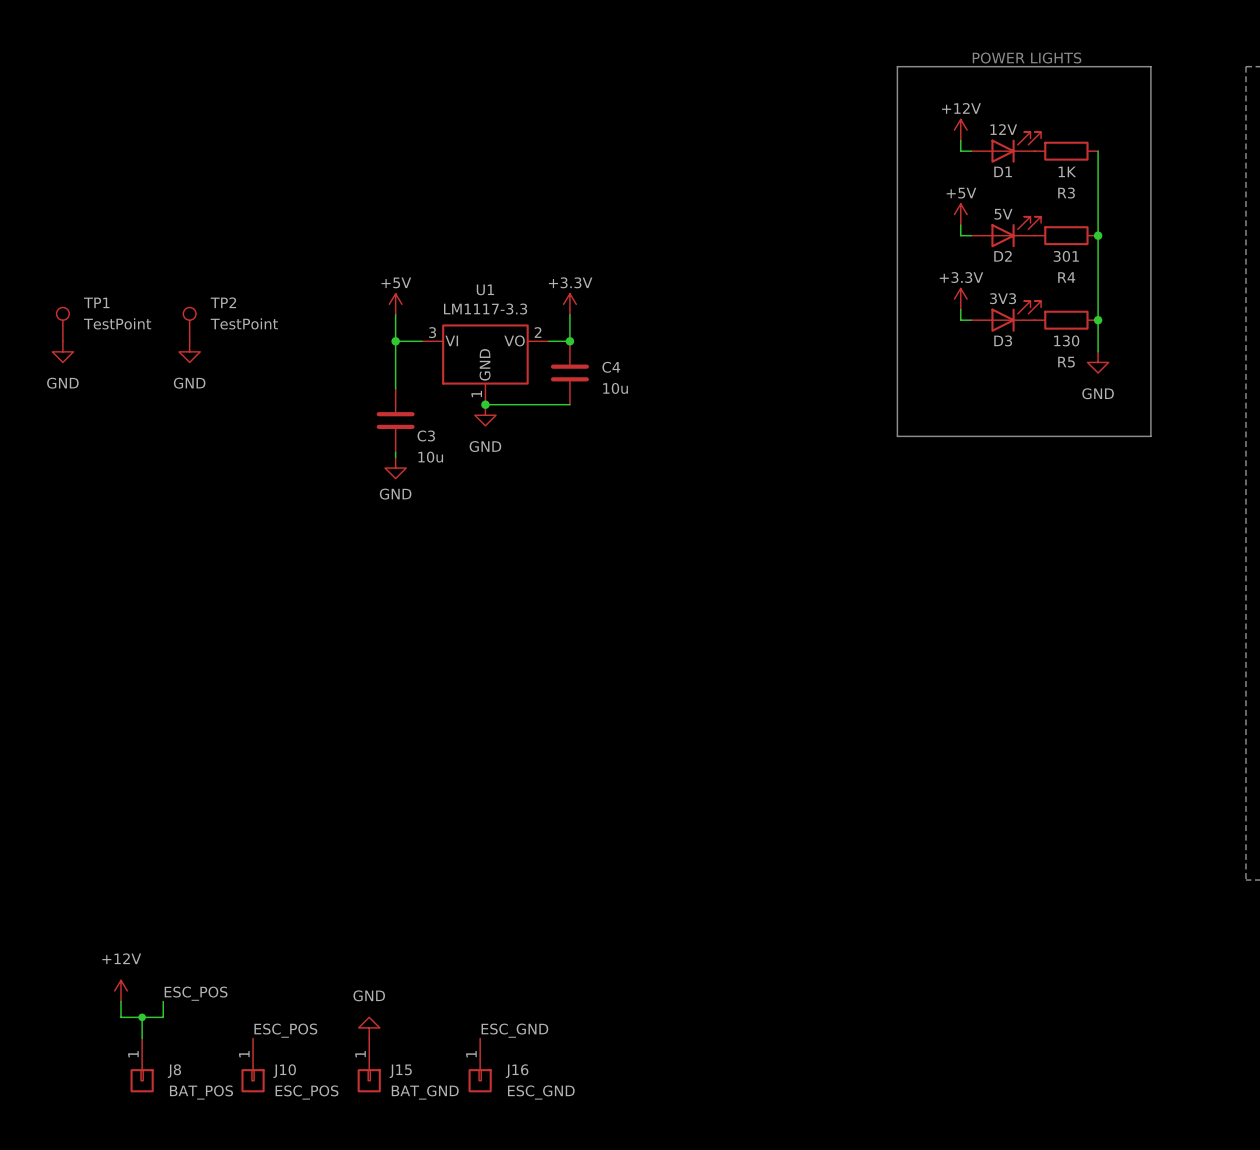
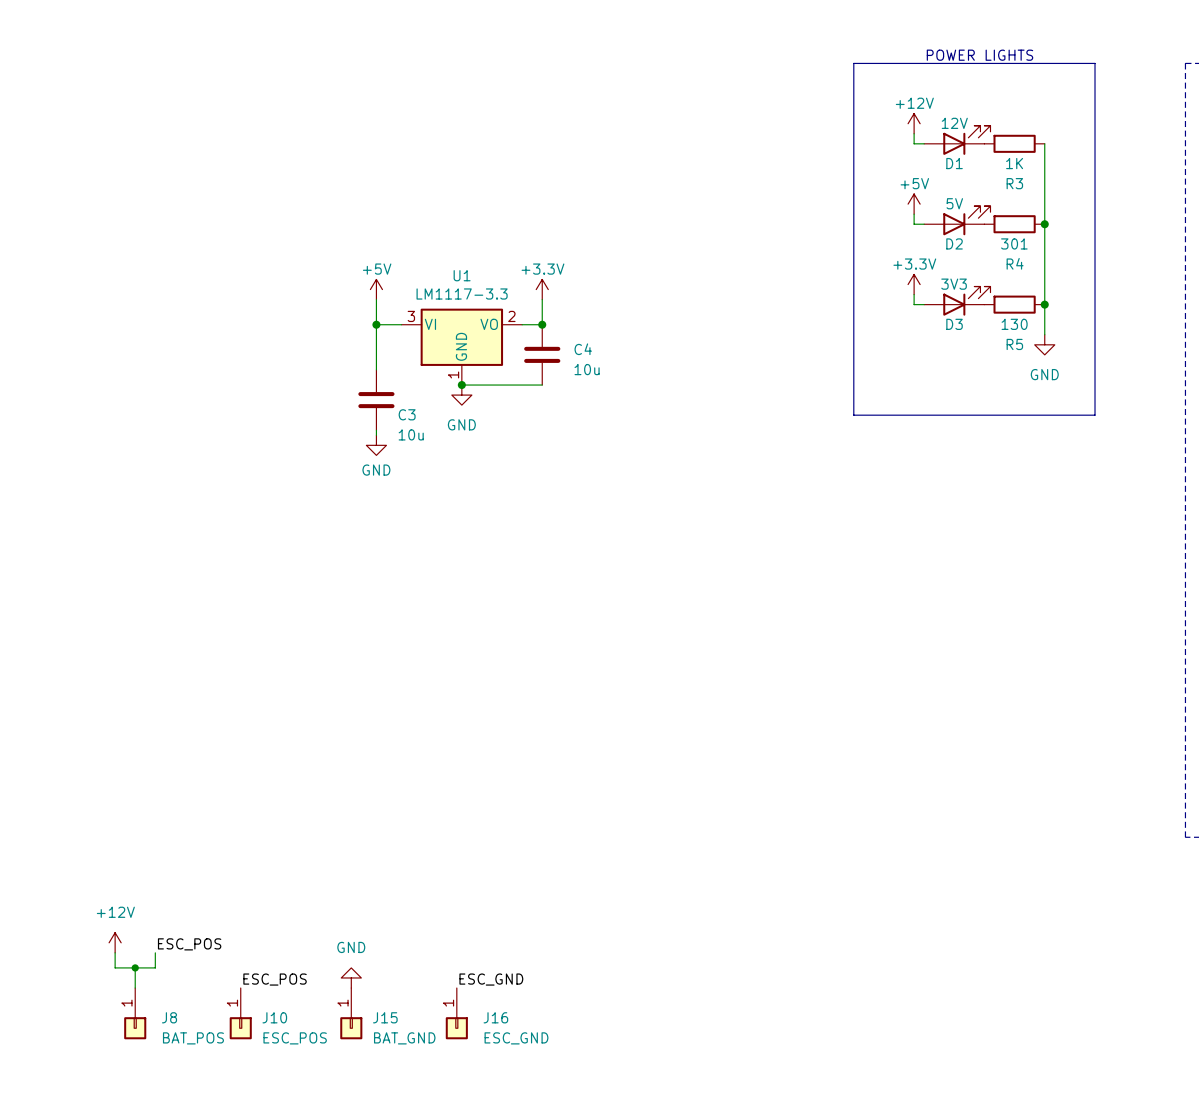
TP1: TestPoint (62, 324) -> none
TP2: TestPoint (189, 324) -> none
power symbol: GND (62, 351) -> none
power symbol: GND (189, 351) -> none

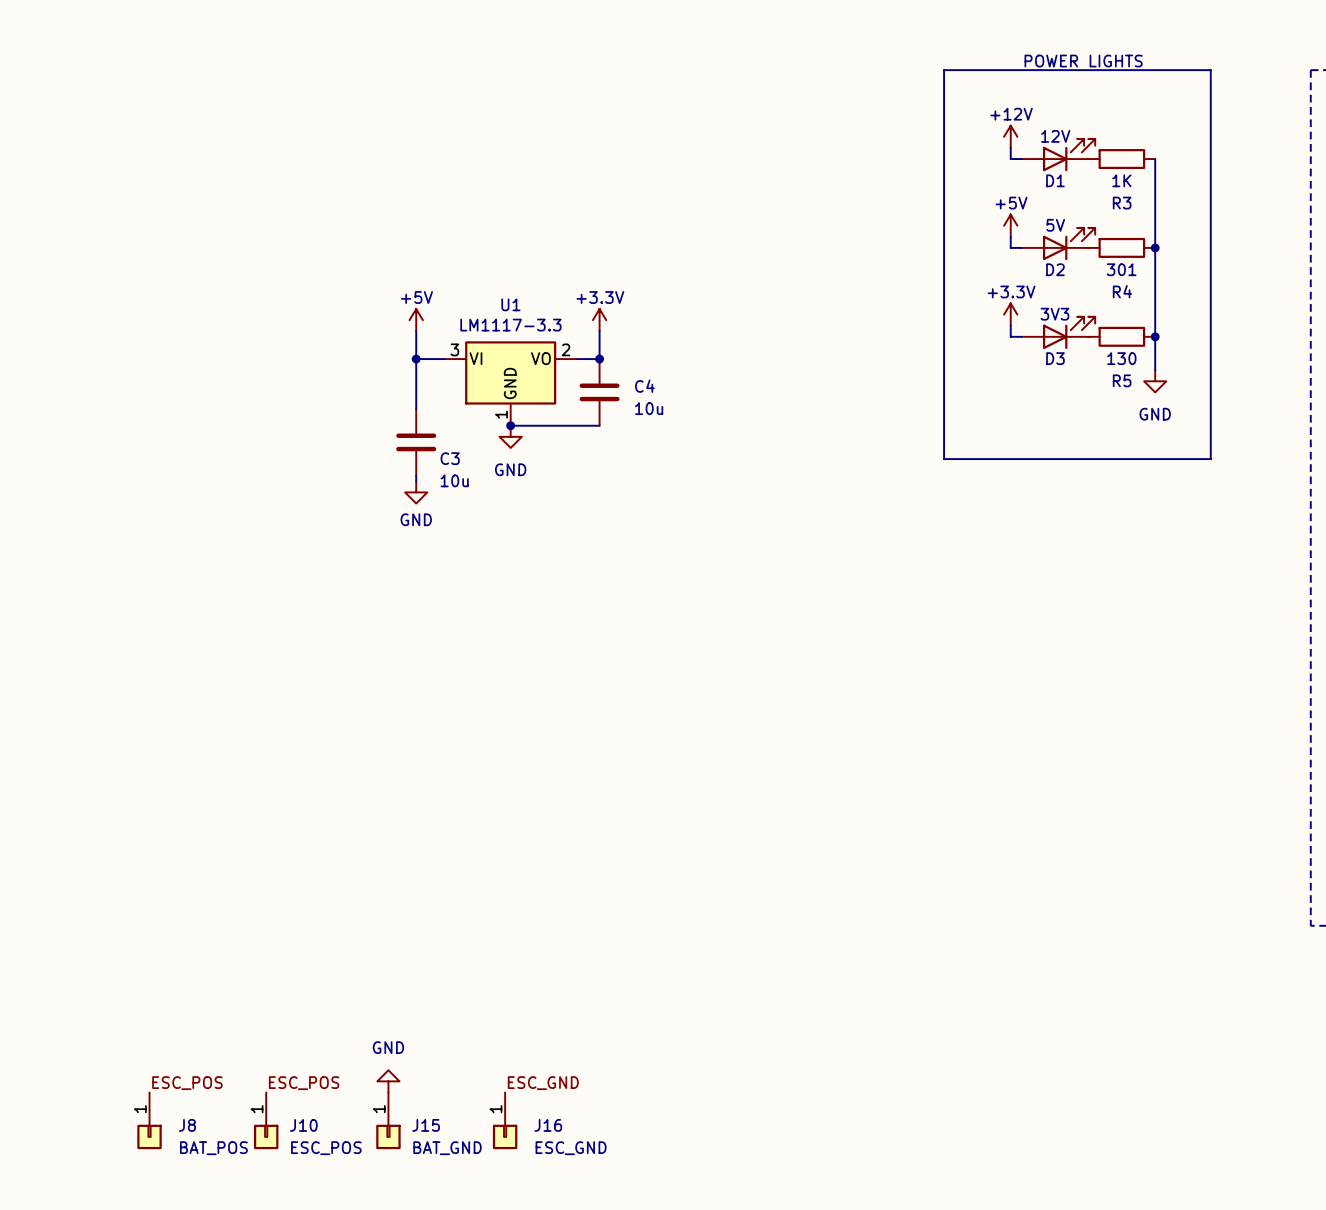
power symbol: +12V (115, 942) -> none
label position: ESC_POS (189, 944) -> ESC_POS (187, 1083)
wire: (115, 952) (115, 967) (155, 967) (155, 952) -> none
wire: (135, 967) (135, 988) -> none
junction: (135, 967) -> none

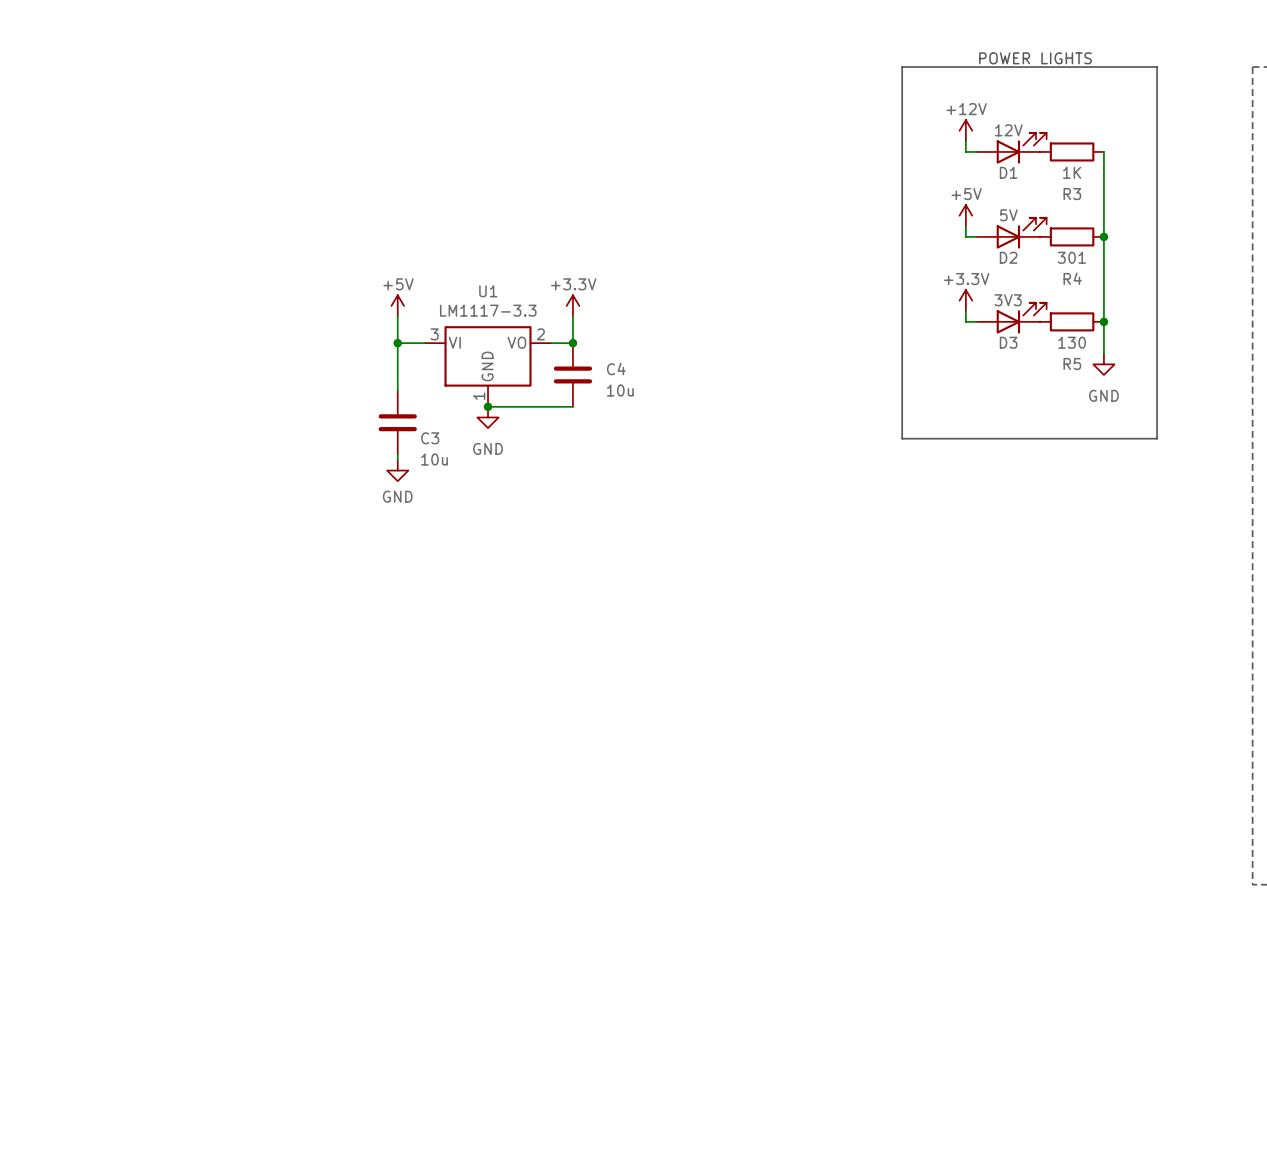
power symbol: GND (388, 1081) -> none
label: ESC_POS (187, 1083) -> none
label: ESC_POS (304, 1083) -> none
label: ESC_GND (543, 1083) -> none
J8: BAT_POS (149, 1120) -> none
J10: ESC_POS (266, 1120) -> none
J15: BAT_GND (388, 1120) -> none
J16: ESC_GND (505, 1120) -> none

